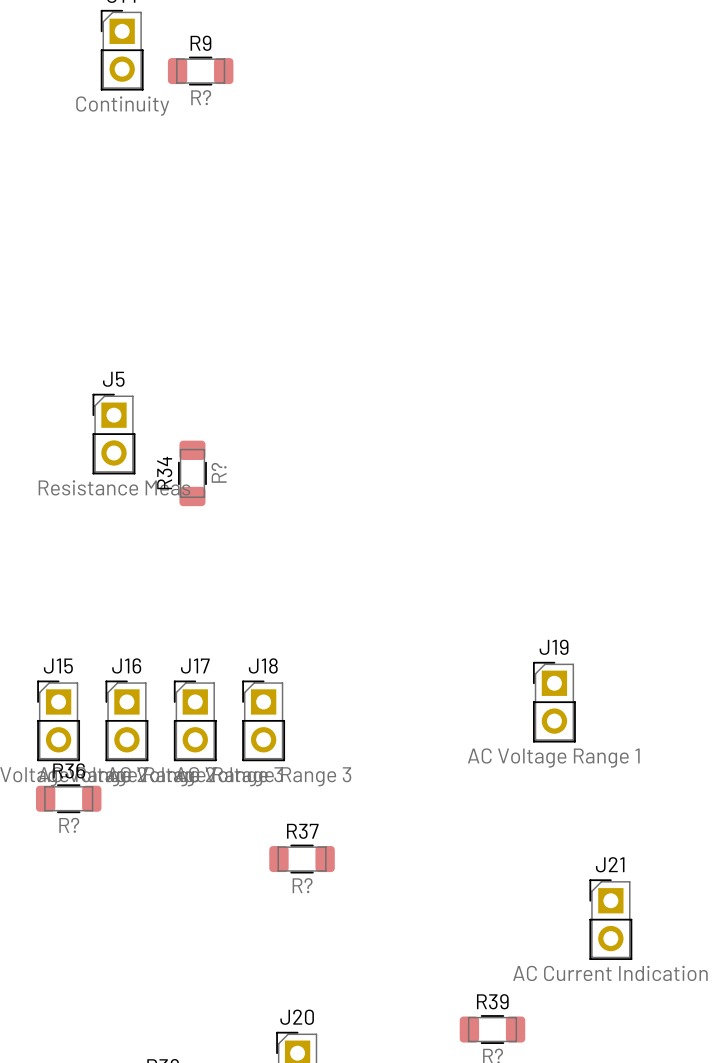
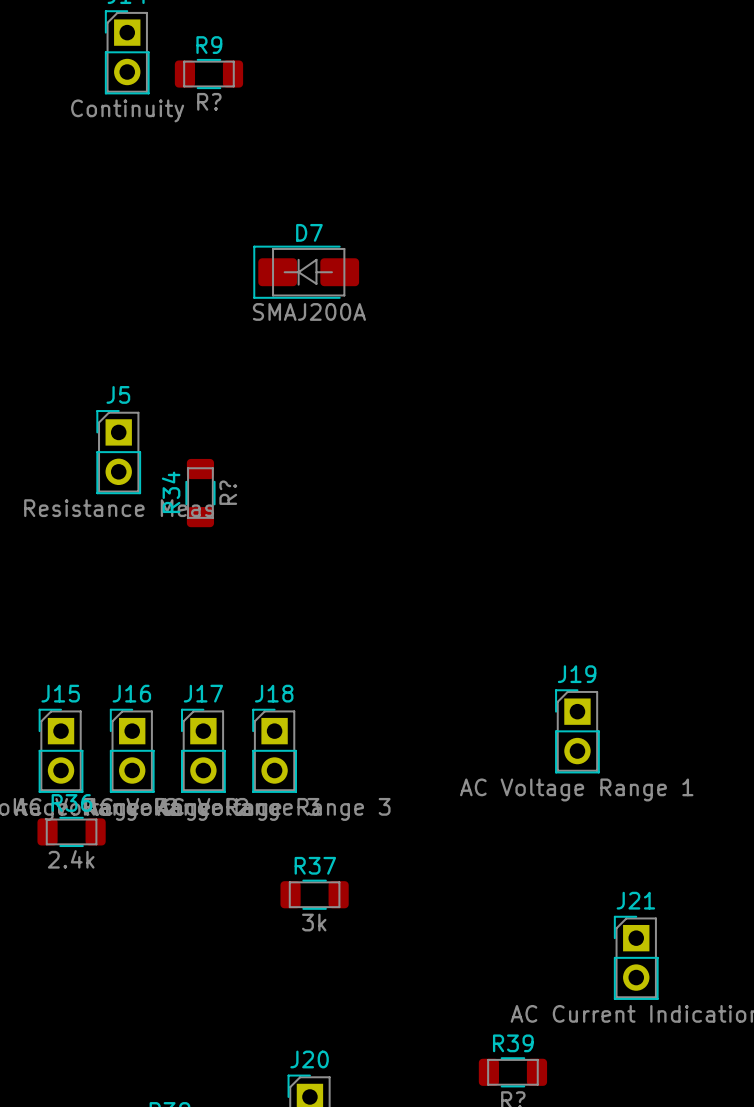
D7: none -> SMAJ200A (306, 272)
R36 value: R? (69, 825) -> 2.4k (71, 859)
R37 value: R? (302, 885) -> 3k (314, 922)

